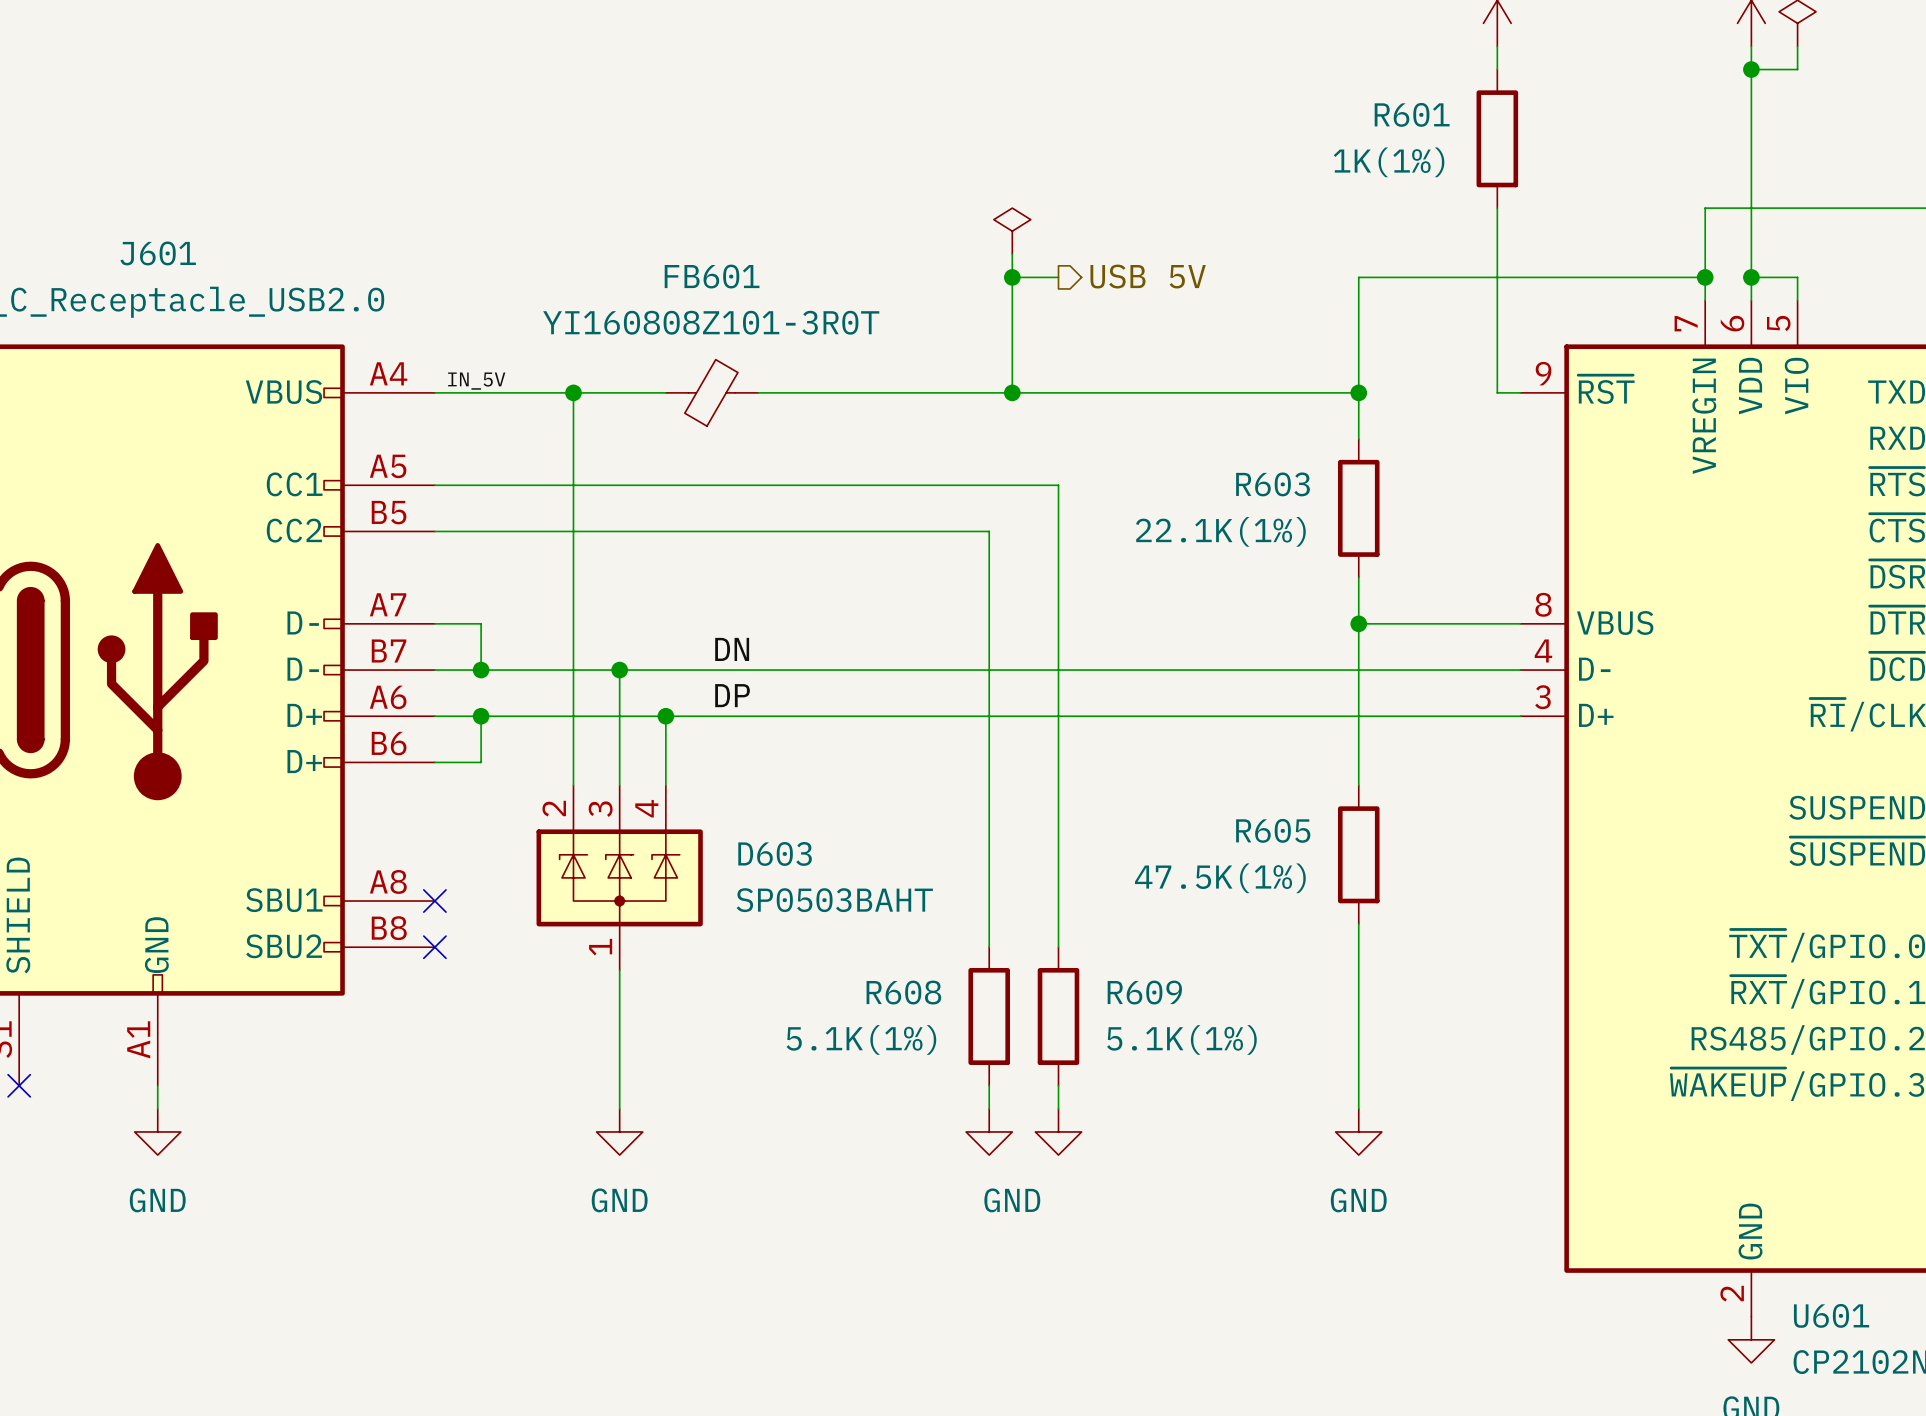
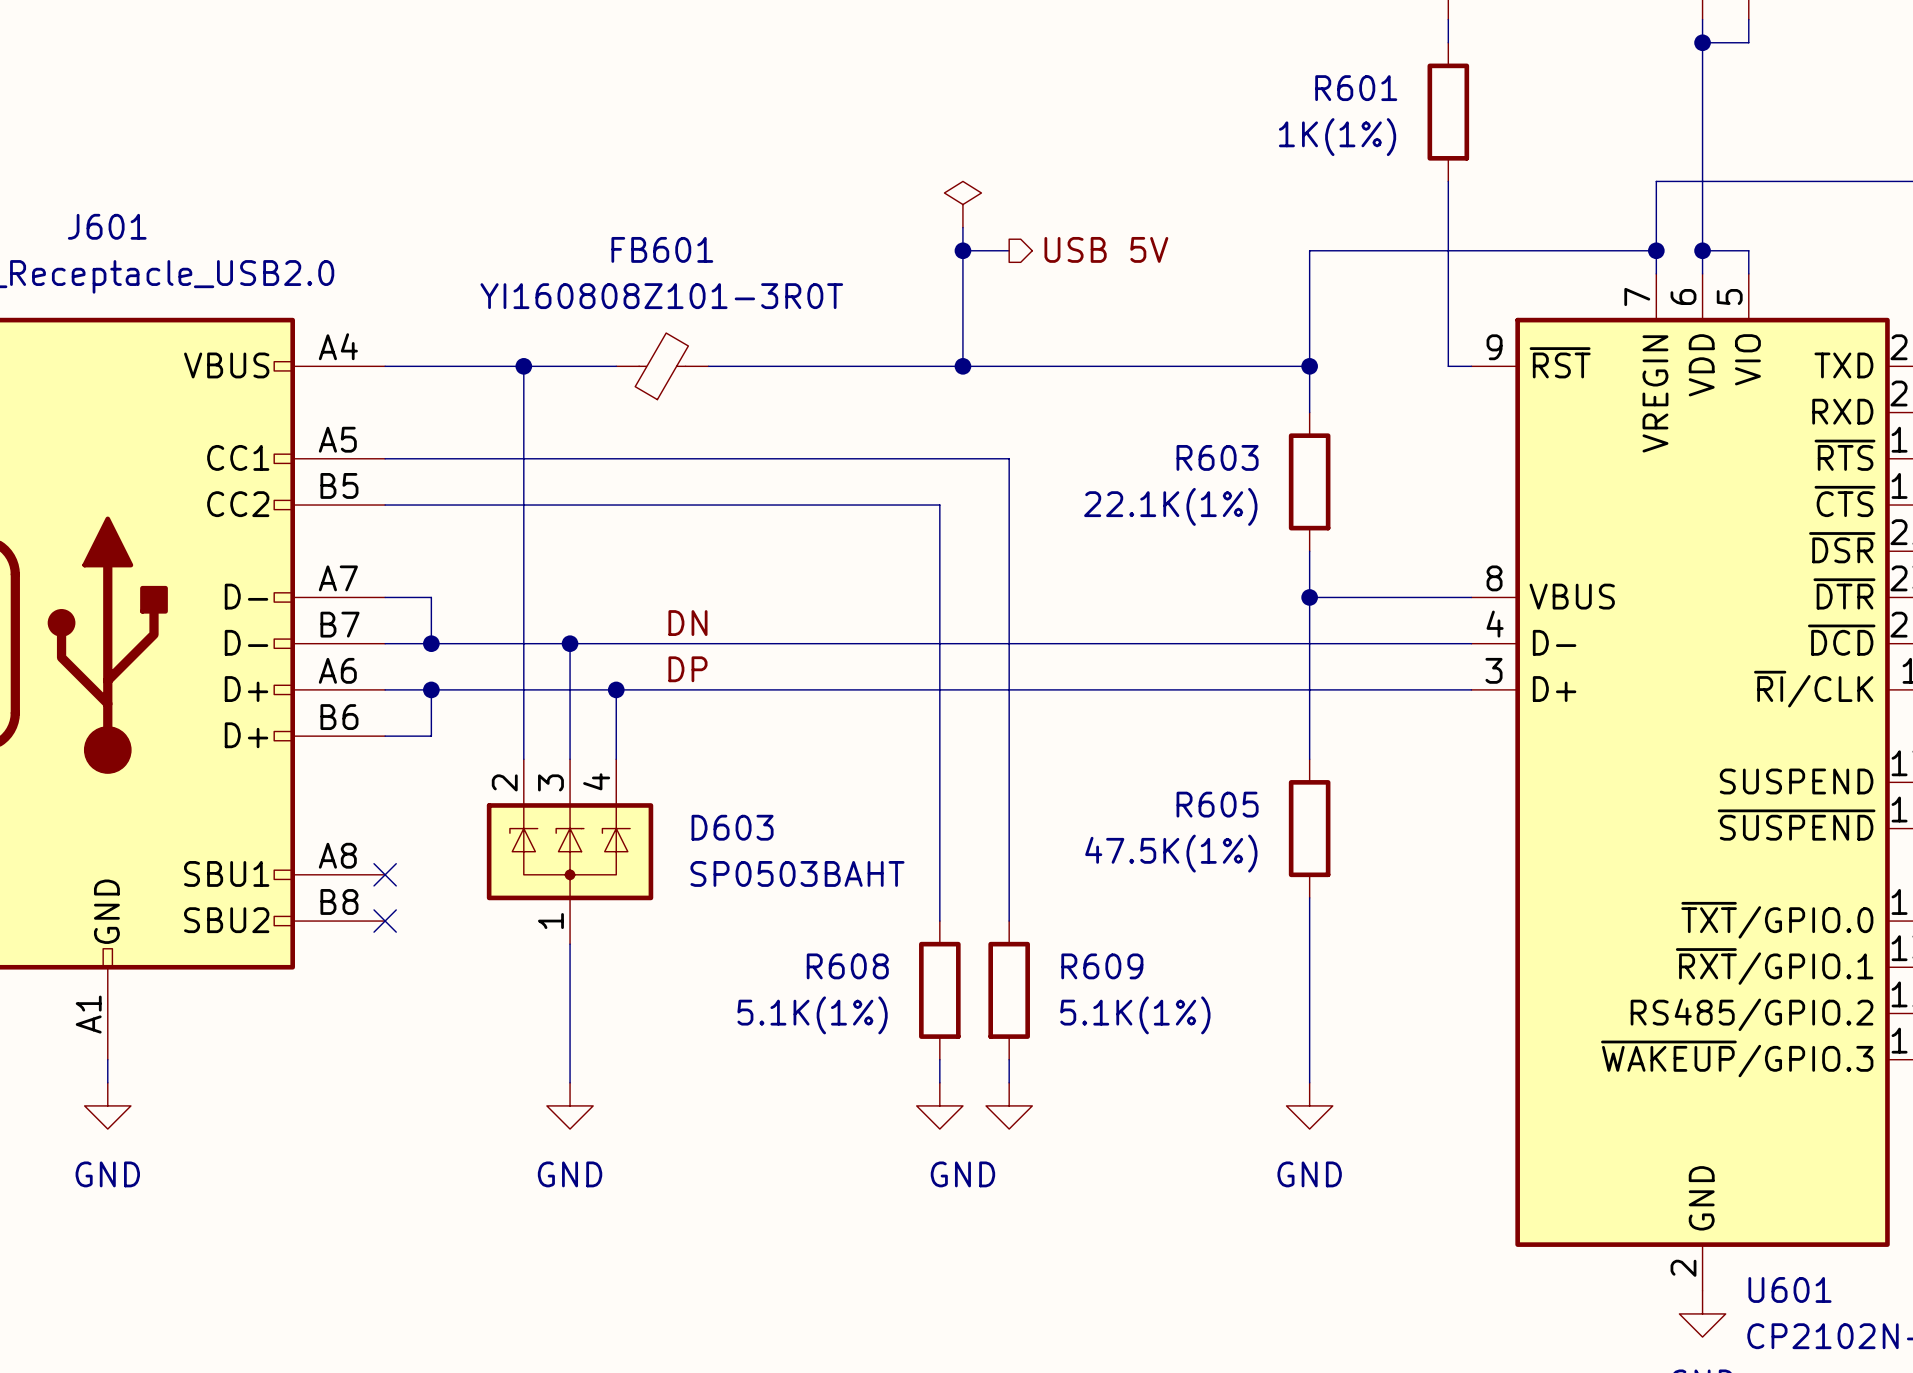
label: IN_5V (476, 381) -> none

